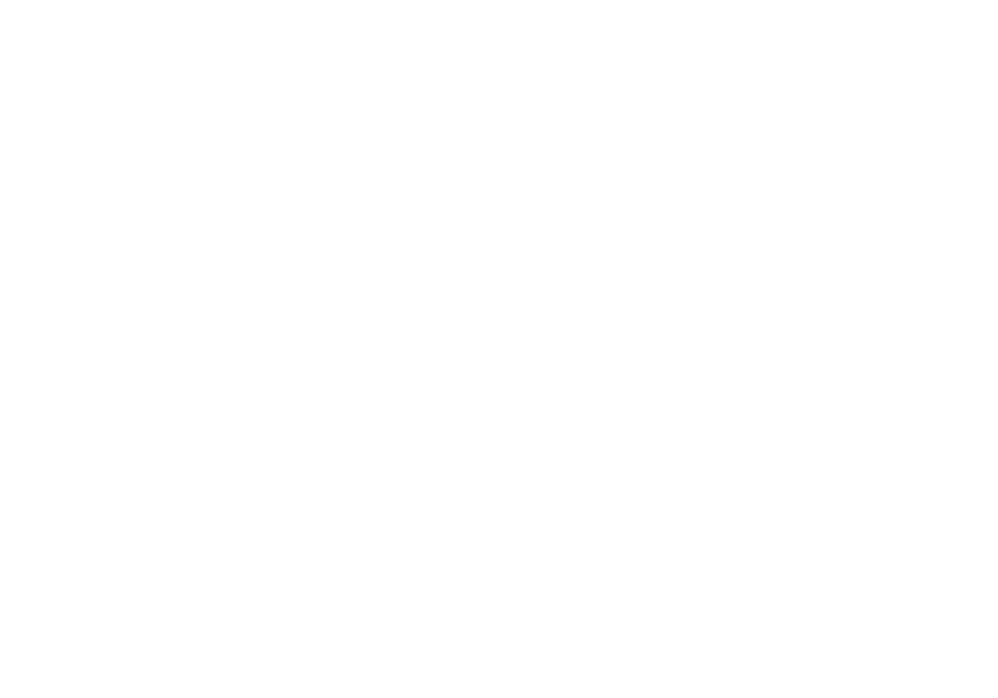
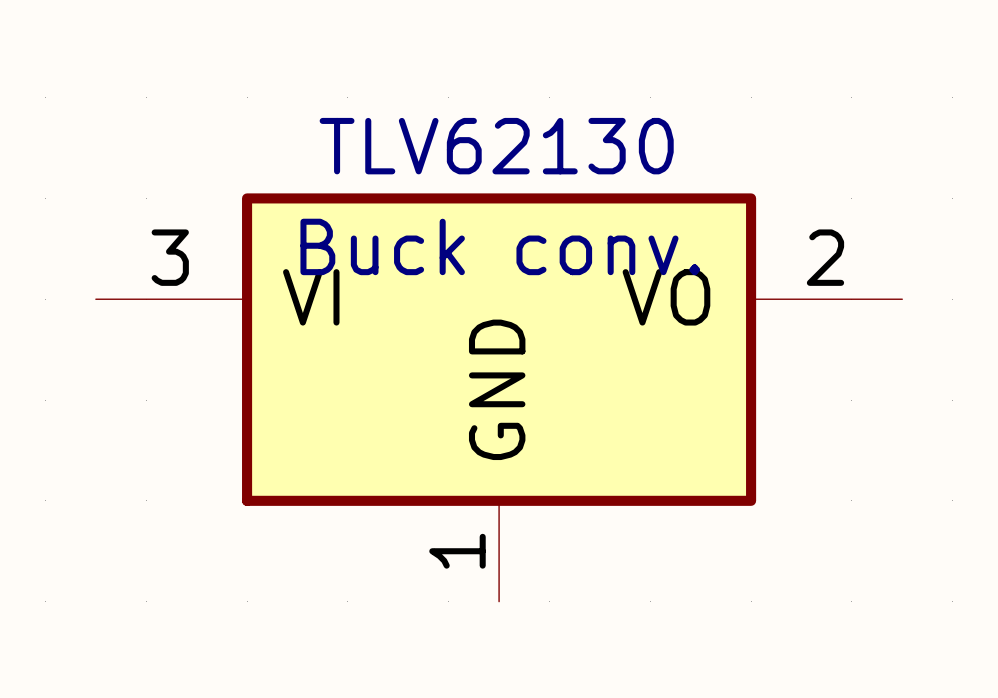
part: none -> TLV62130 (499, 397)

